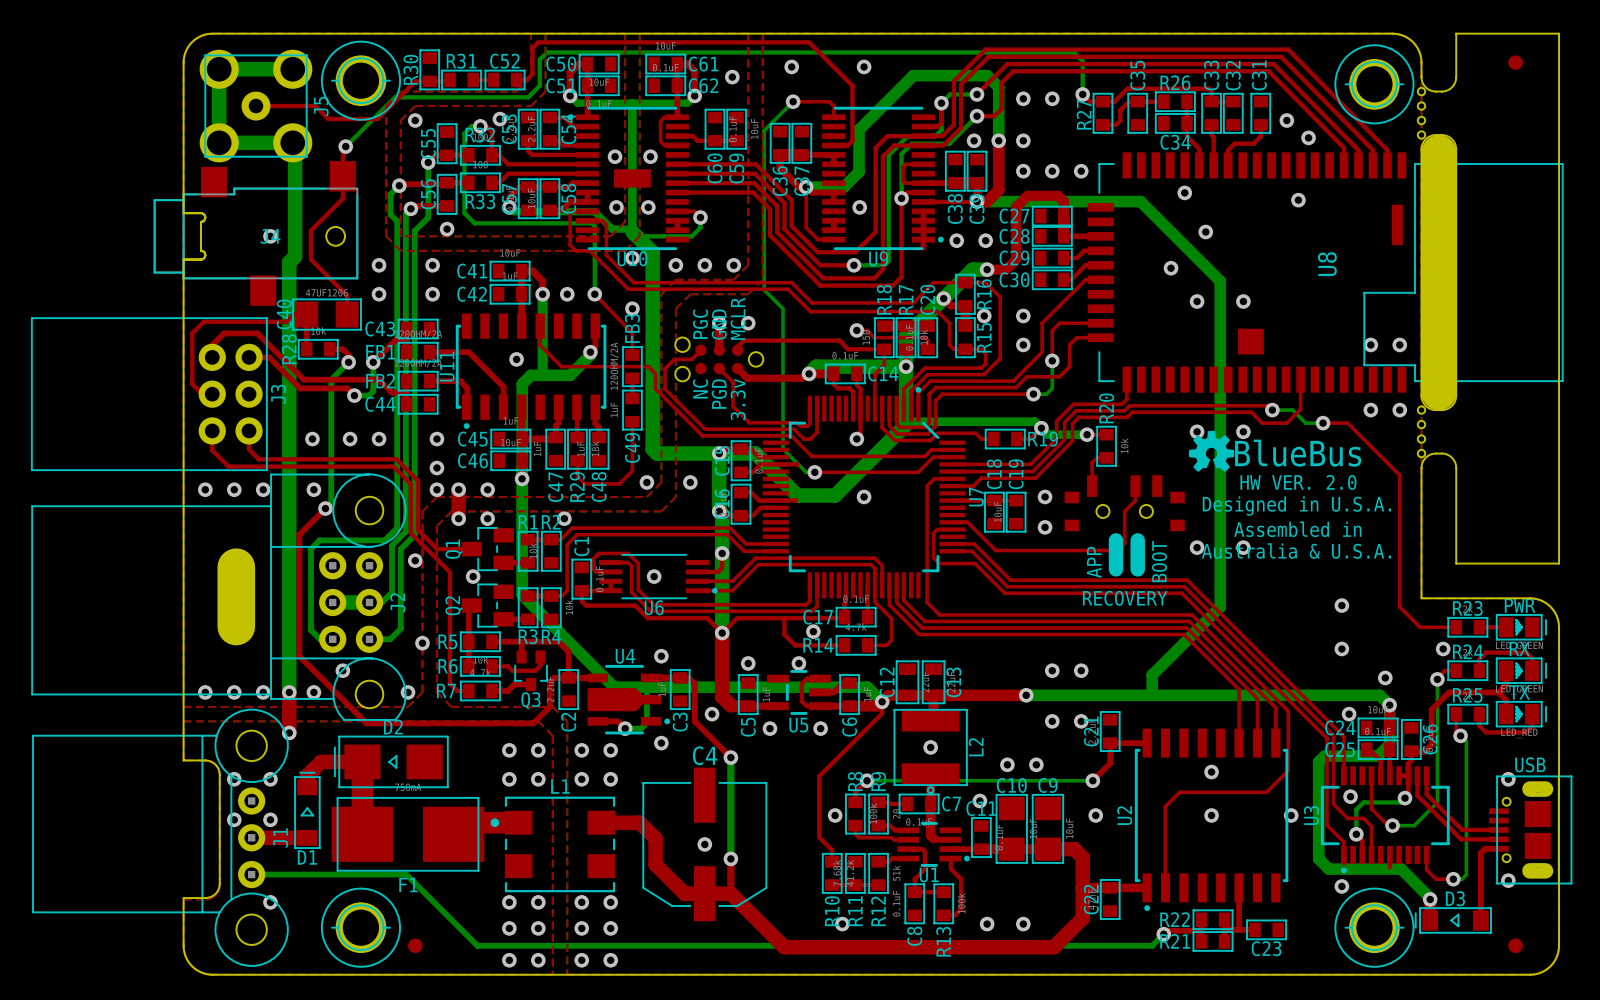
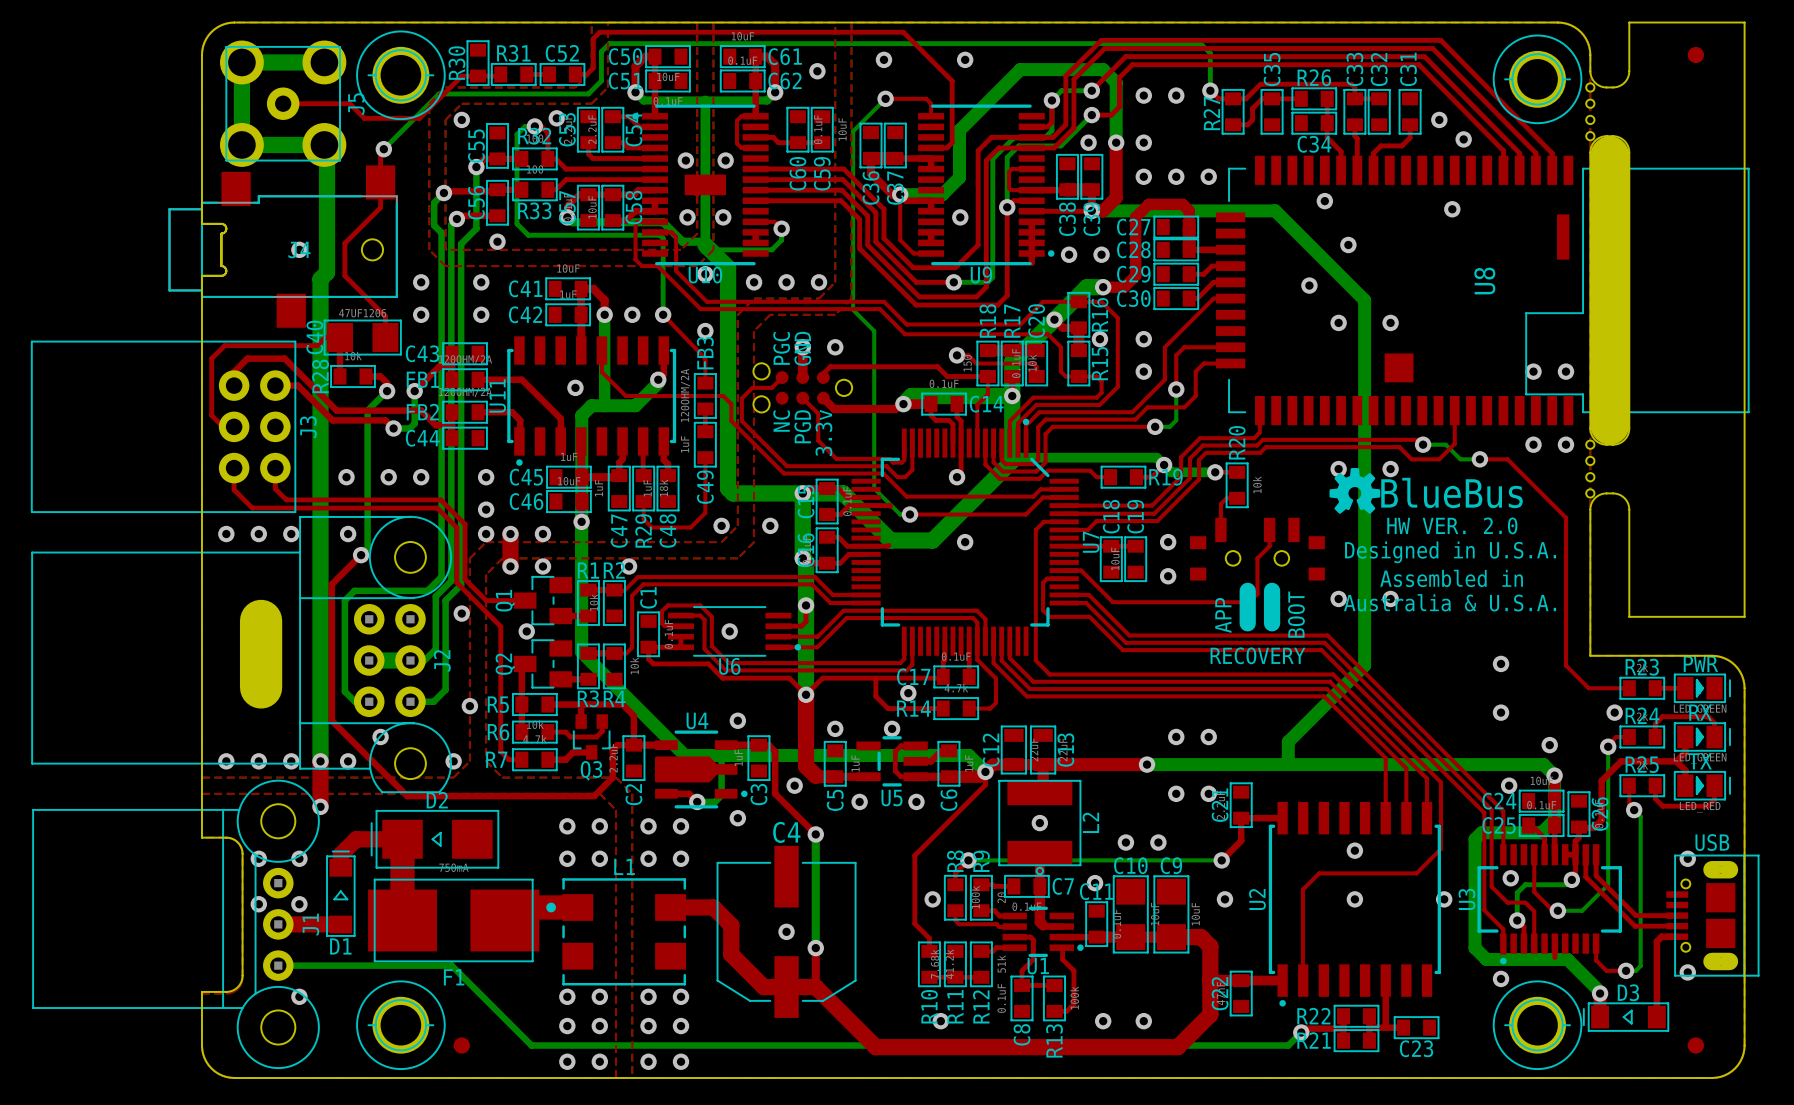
text: MCLR (738, 318) -> none

